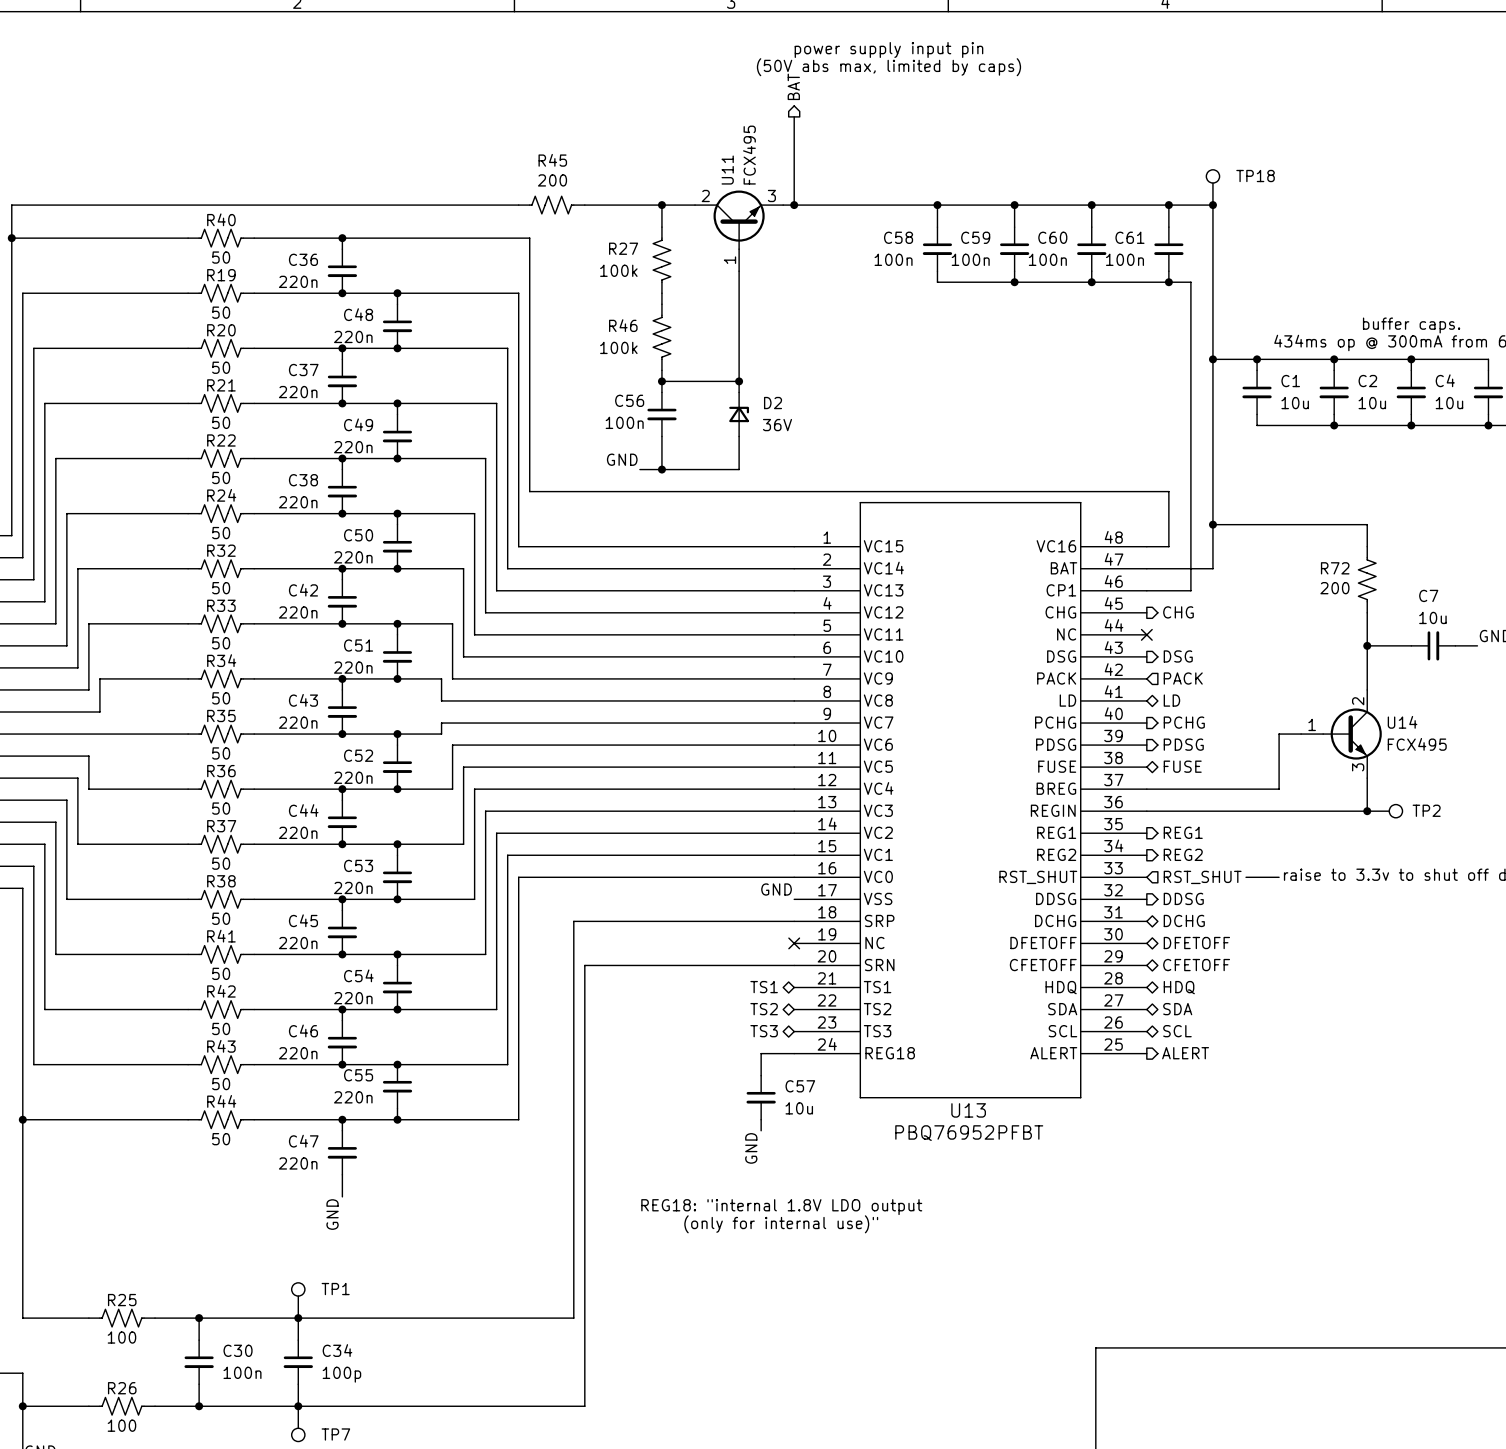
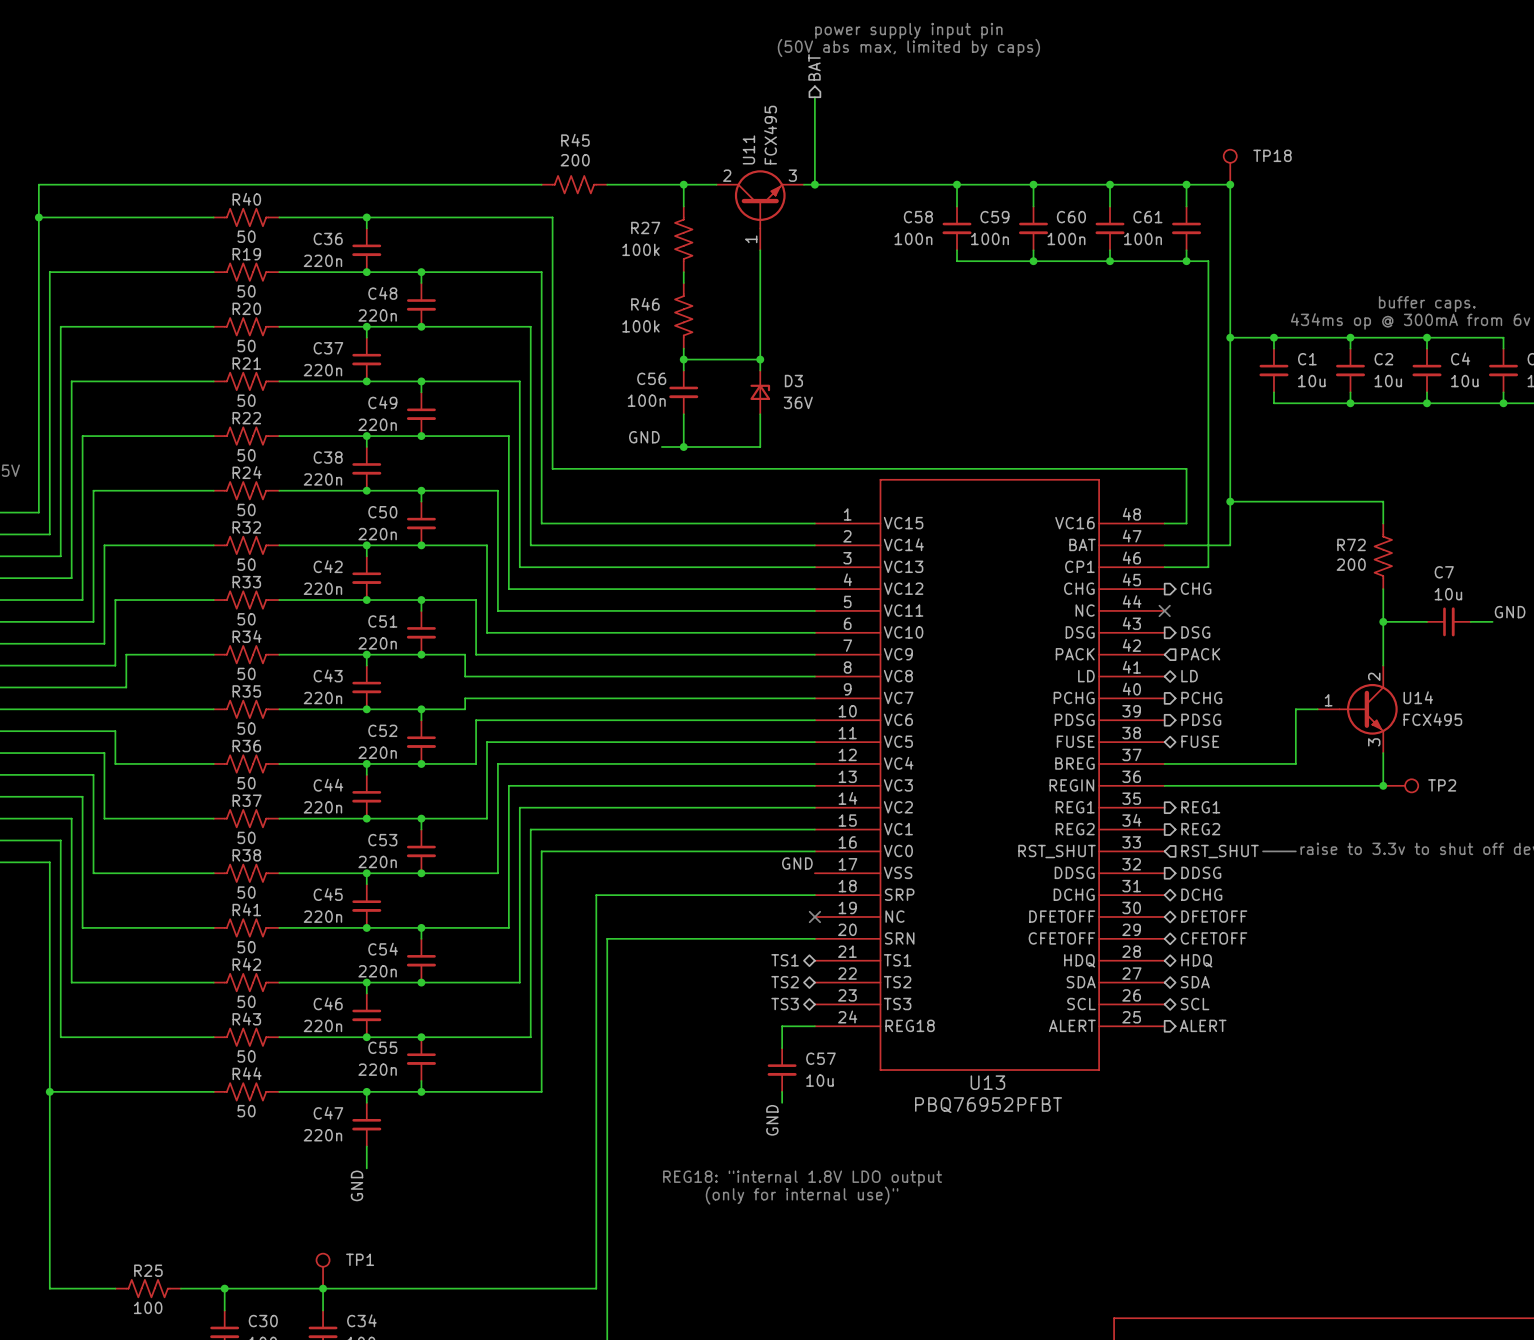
D2 name: D2 (773, 403) -> D3 (793, 381)

